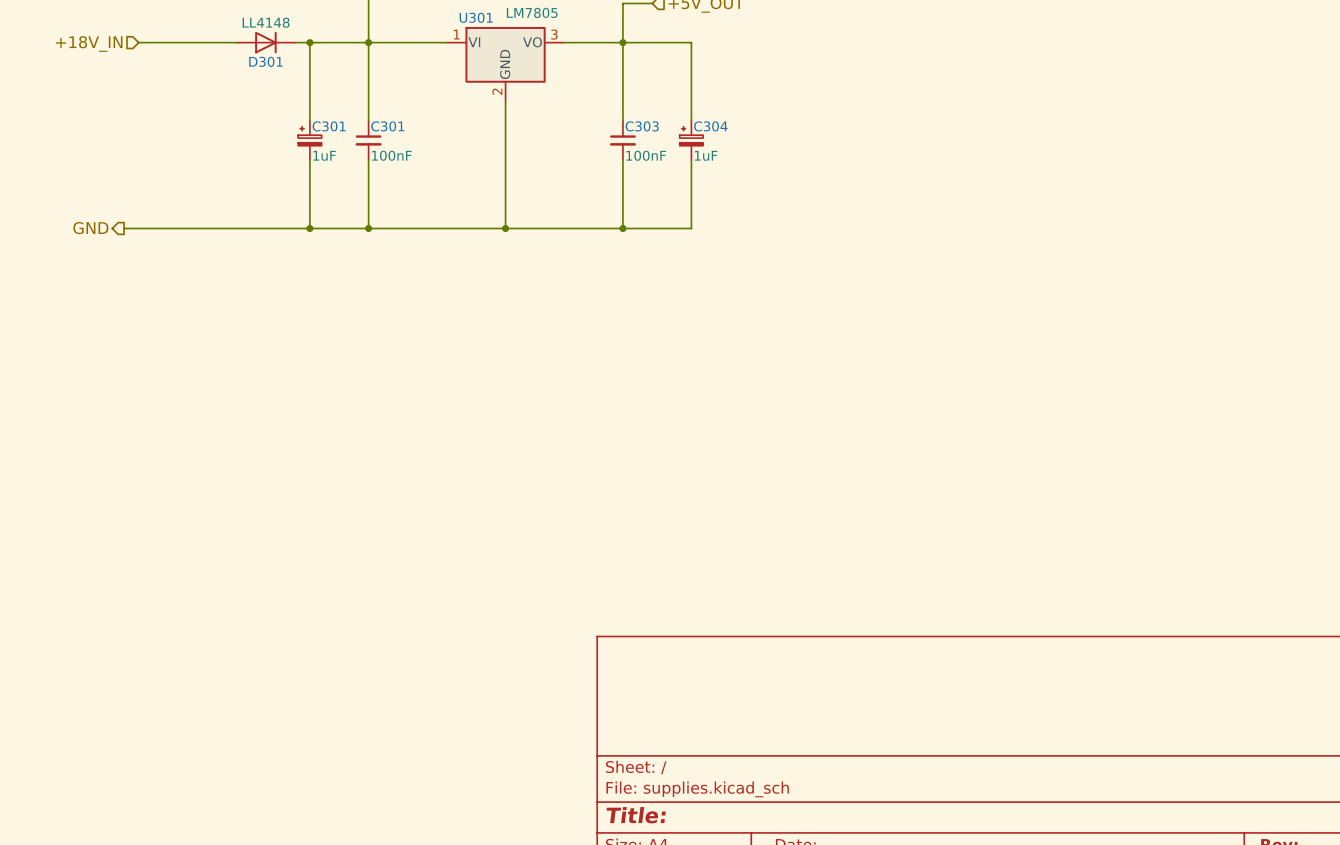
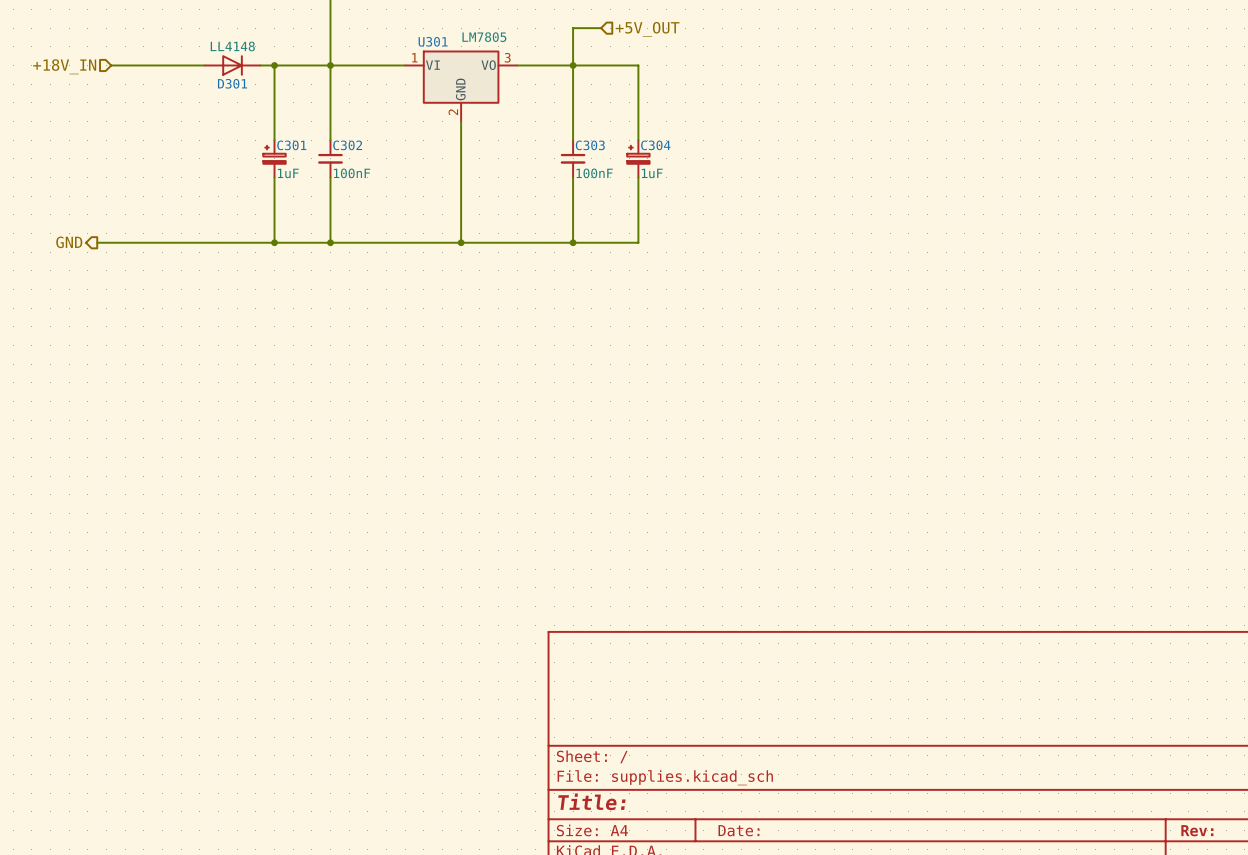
C301 name: C301 (387, 126) -> C302 (347, 145)

